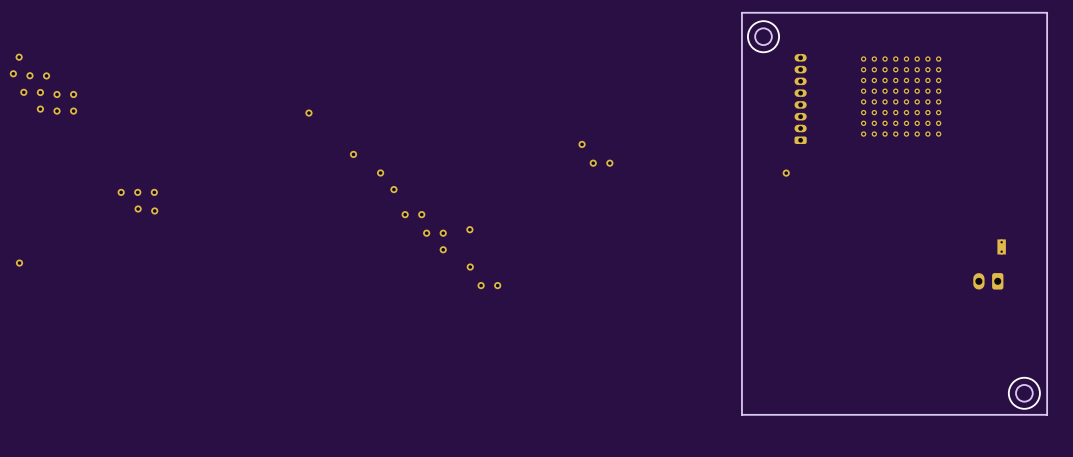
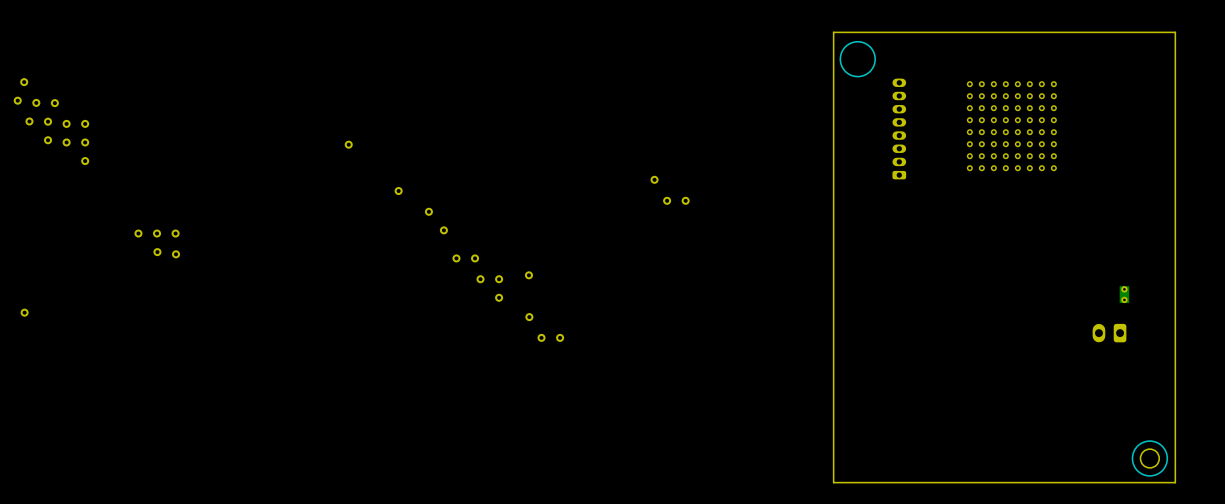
round board edge: [754, 27, 773, 46] -> none
part: none -> (85, 161)
part: (786, 173) -> none

